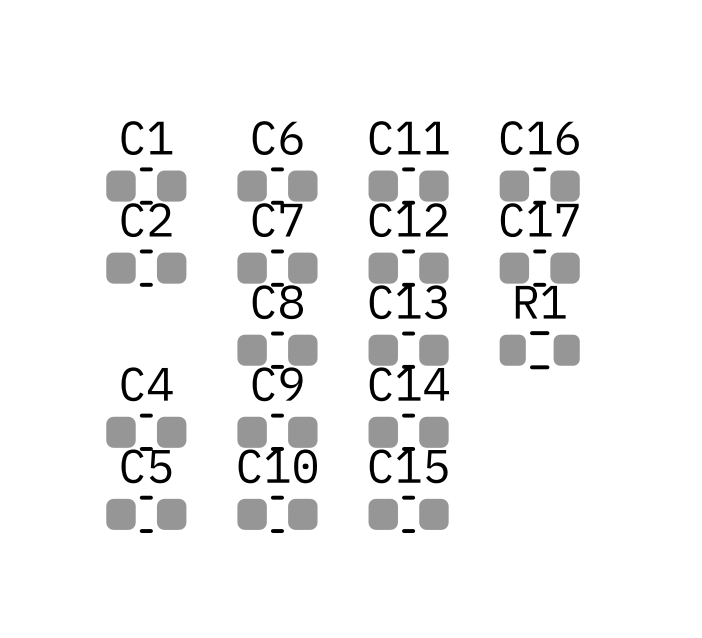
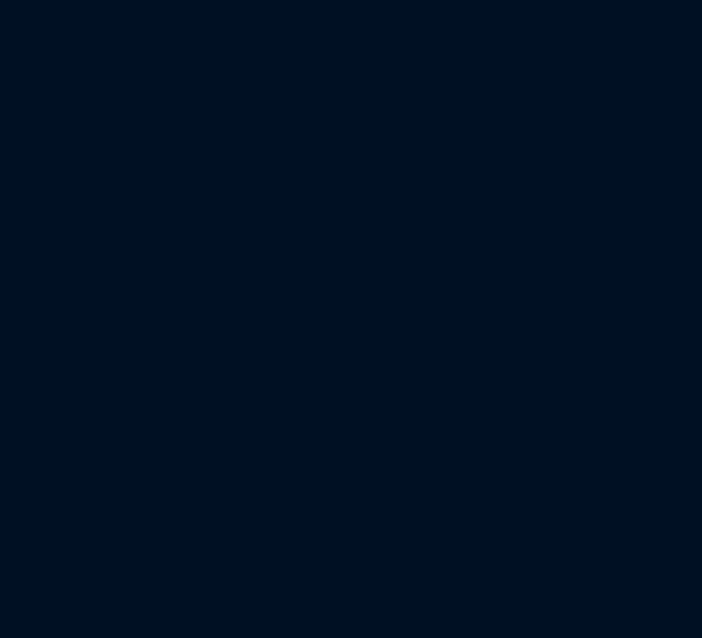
C1: (146, 186) -> none
C6: (277, 186) -> none
C11: (408, 186) -> none
C16: (539, 186) -> none
C2: (146, 268) -> none
C7: (277, 268) -> none
C12: (408, 268) -> none
C17: (539, 268) -> none
C8: (277, 350) -> none
C13: (408, 350) -> none
R1: (539, 350) -> none
C4: (146, 432) -> none
C9: (277, 432) -> none
C14: (408, 432) -> none
C5: (146, 514) -> none
C10: (277, 514) -> none
C15: (408, 514) -> none

